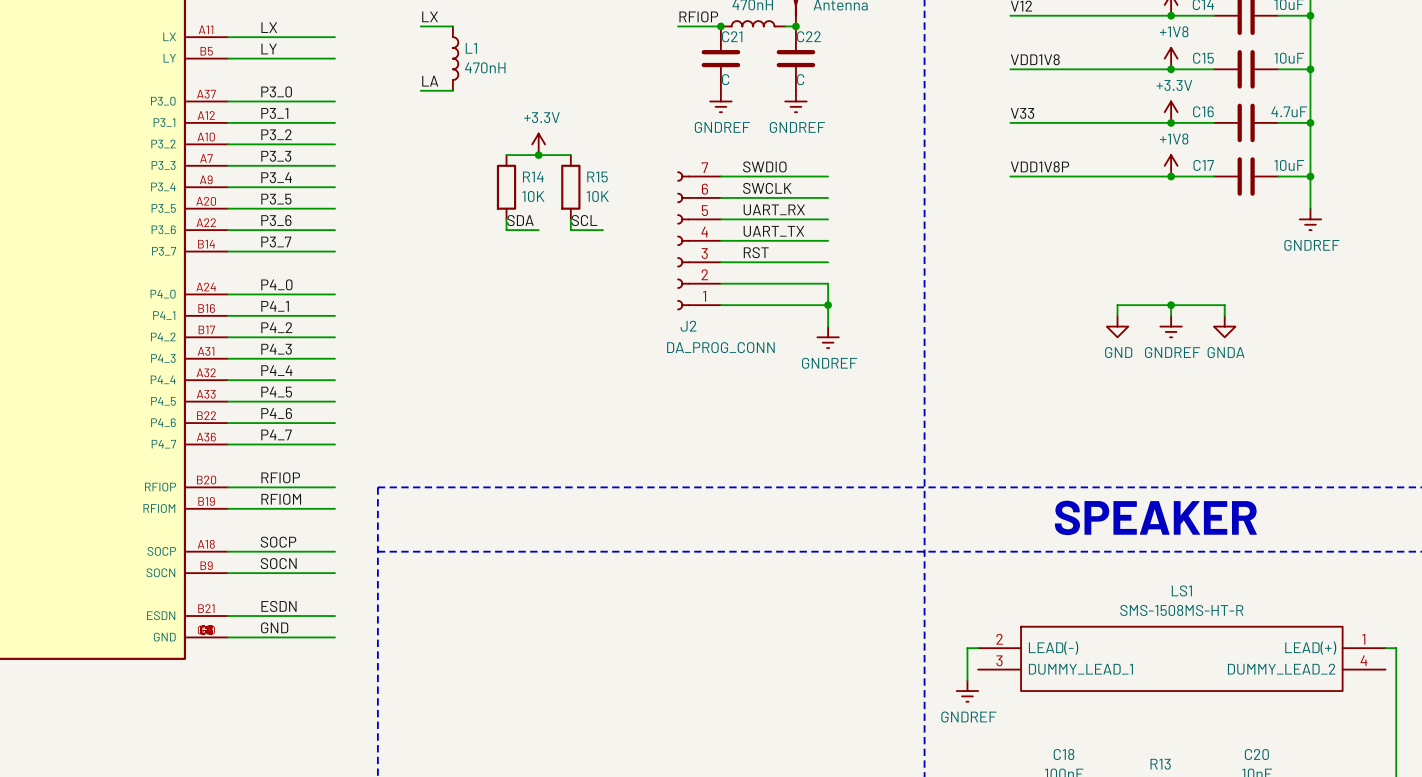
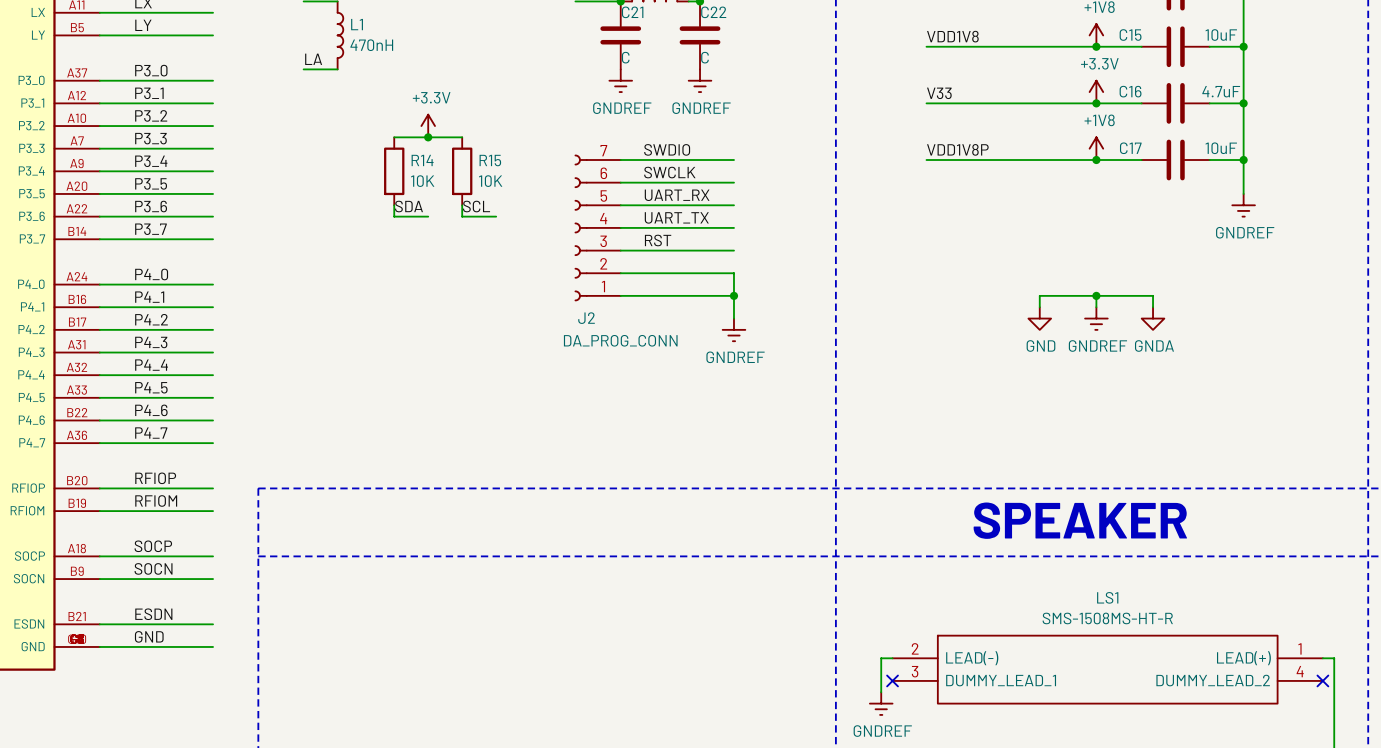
no-connect mark: none -> (892, 680)
no-connect mark: none -> (1322, 680)

